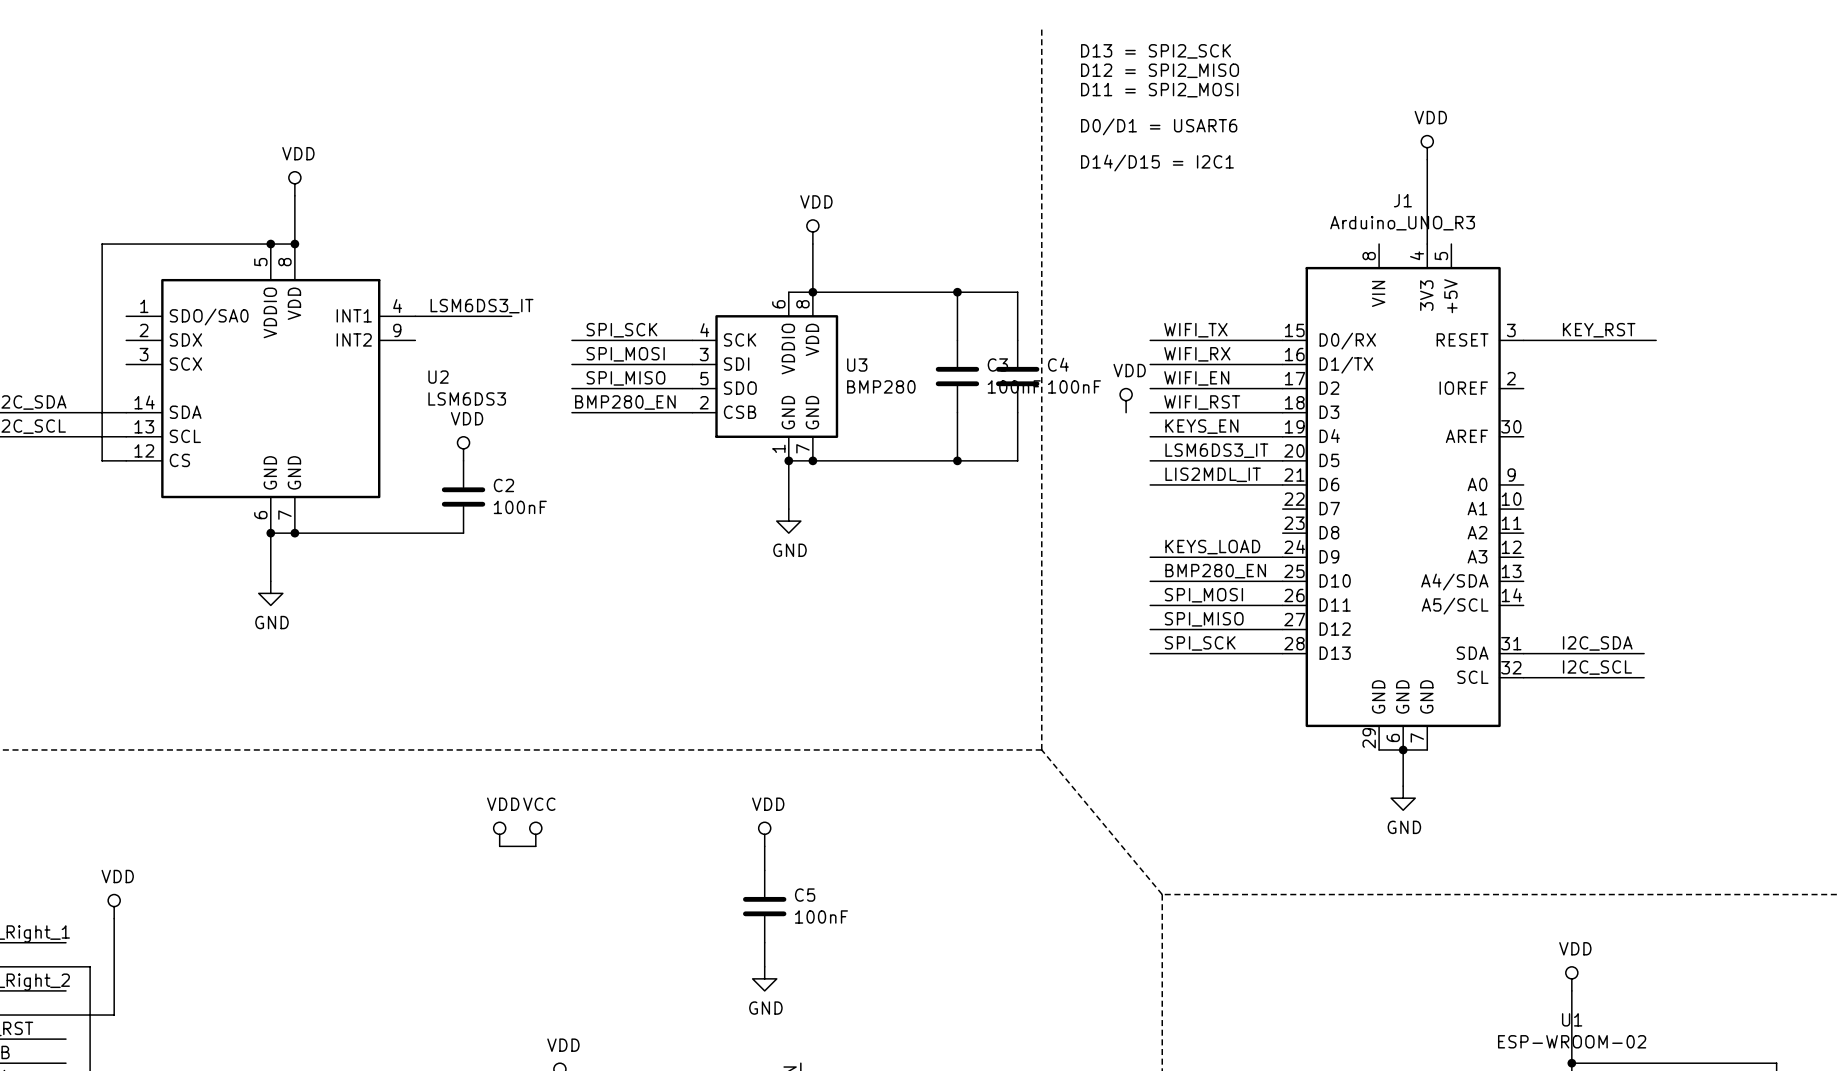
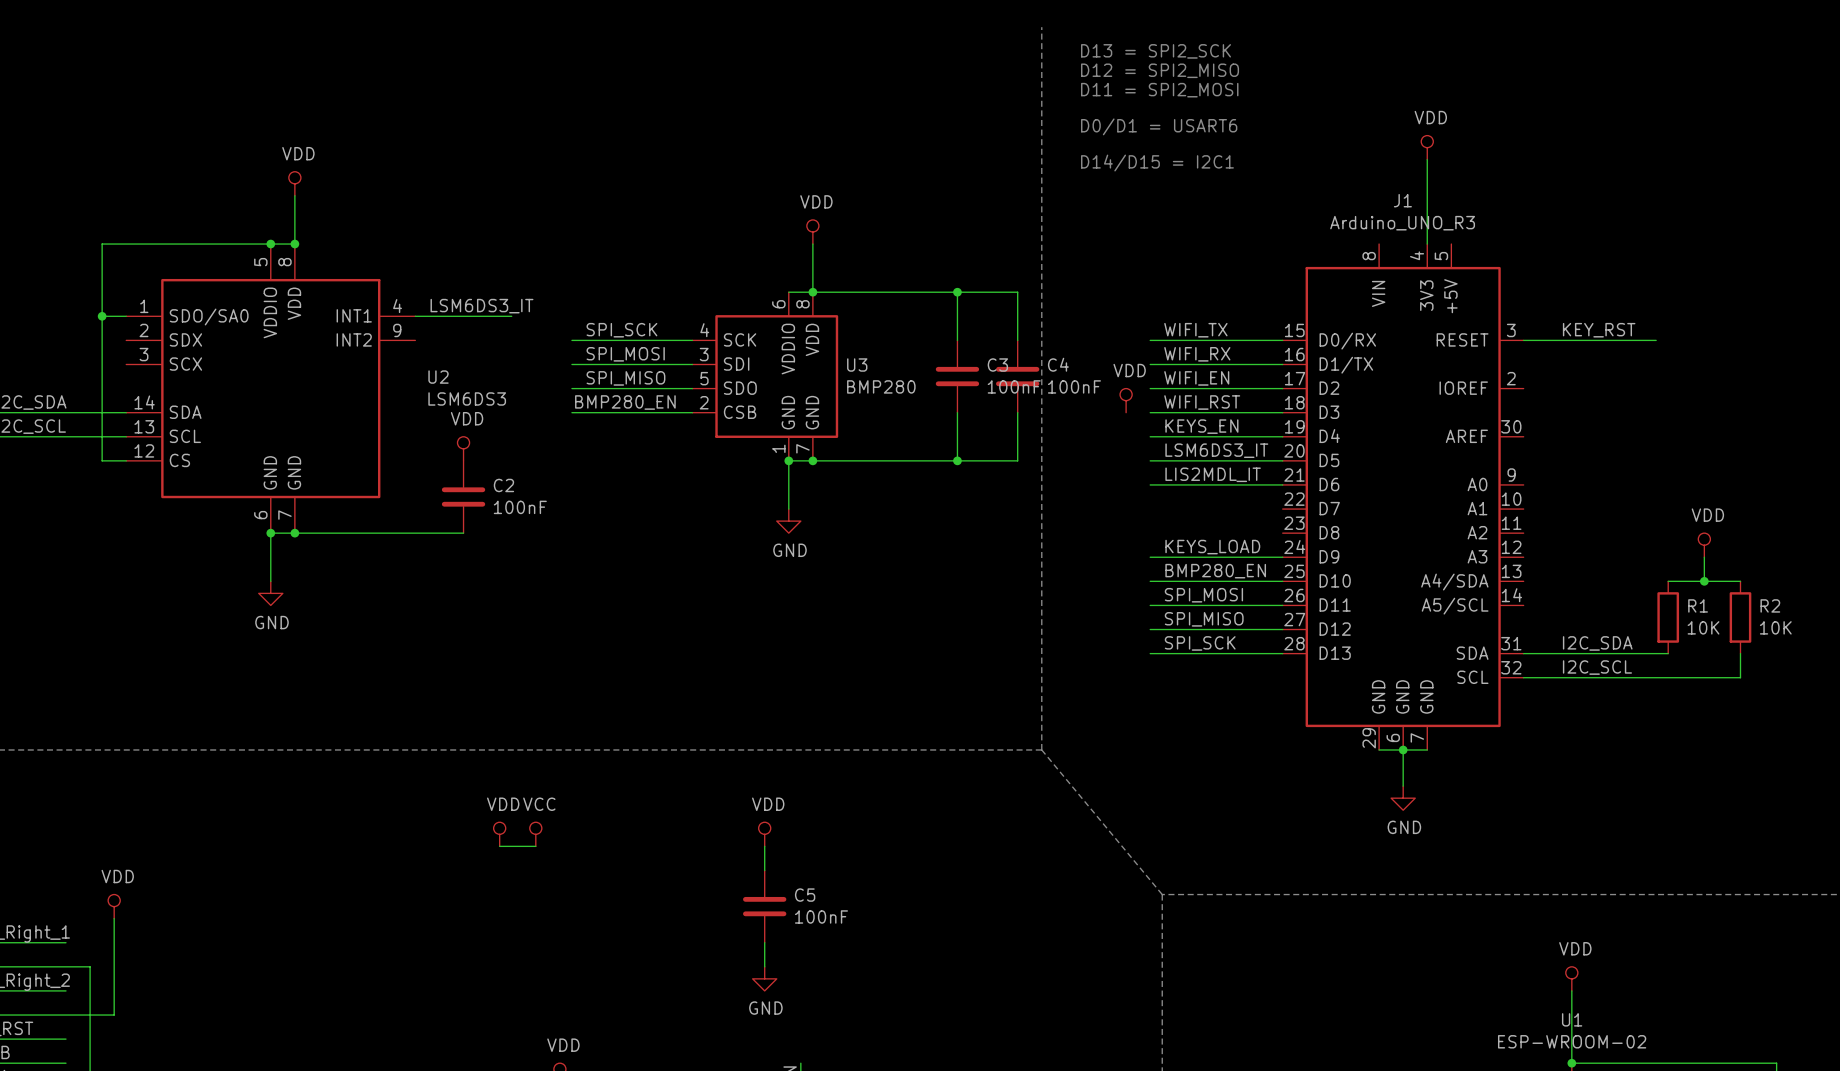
wire: none -> (102, 316) (126, 316)
junction: none -> (102, 316)
power symbol: none -> VDD (1704, 545)
wire: none -> (1704, 557) (1704, 581)
wire: none -> (1668, 581) (1740, 581)
junction: none -> (1704, 581)
R1: none -> 10K (1668, 617)
R2: none -> 10K (1740, 617)
wire: none -> (1644, 653) (1668, 653)
wire: none -> (1740, 653) (1740, 677) (1644, 677)

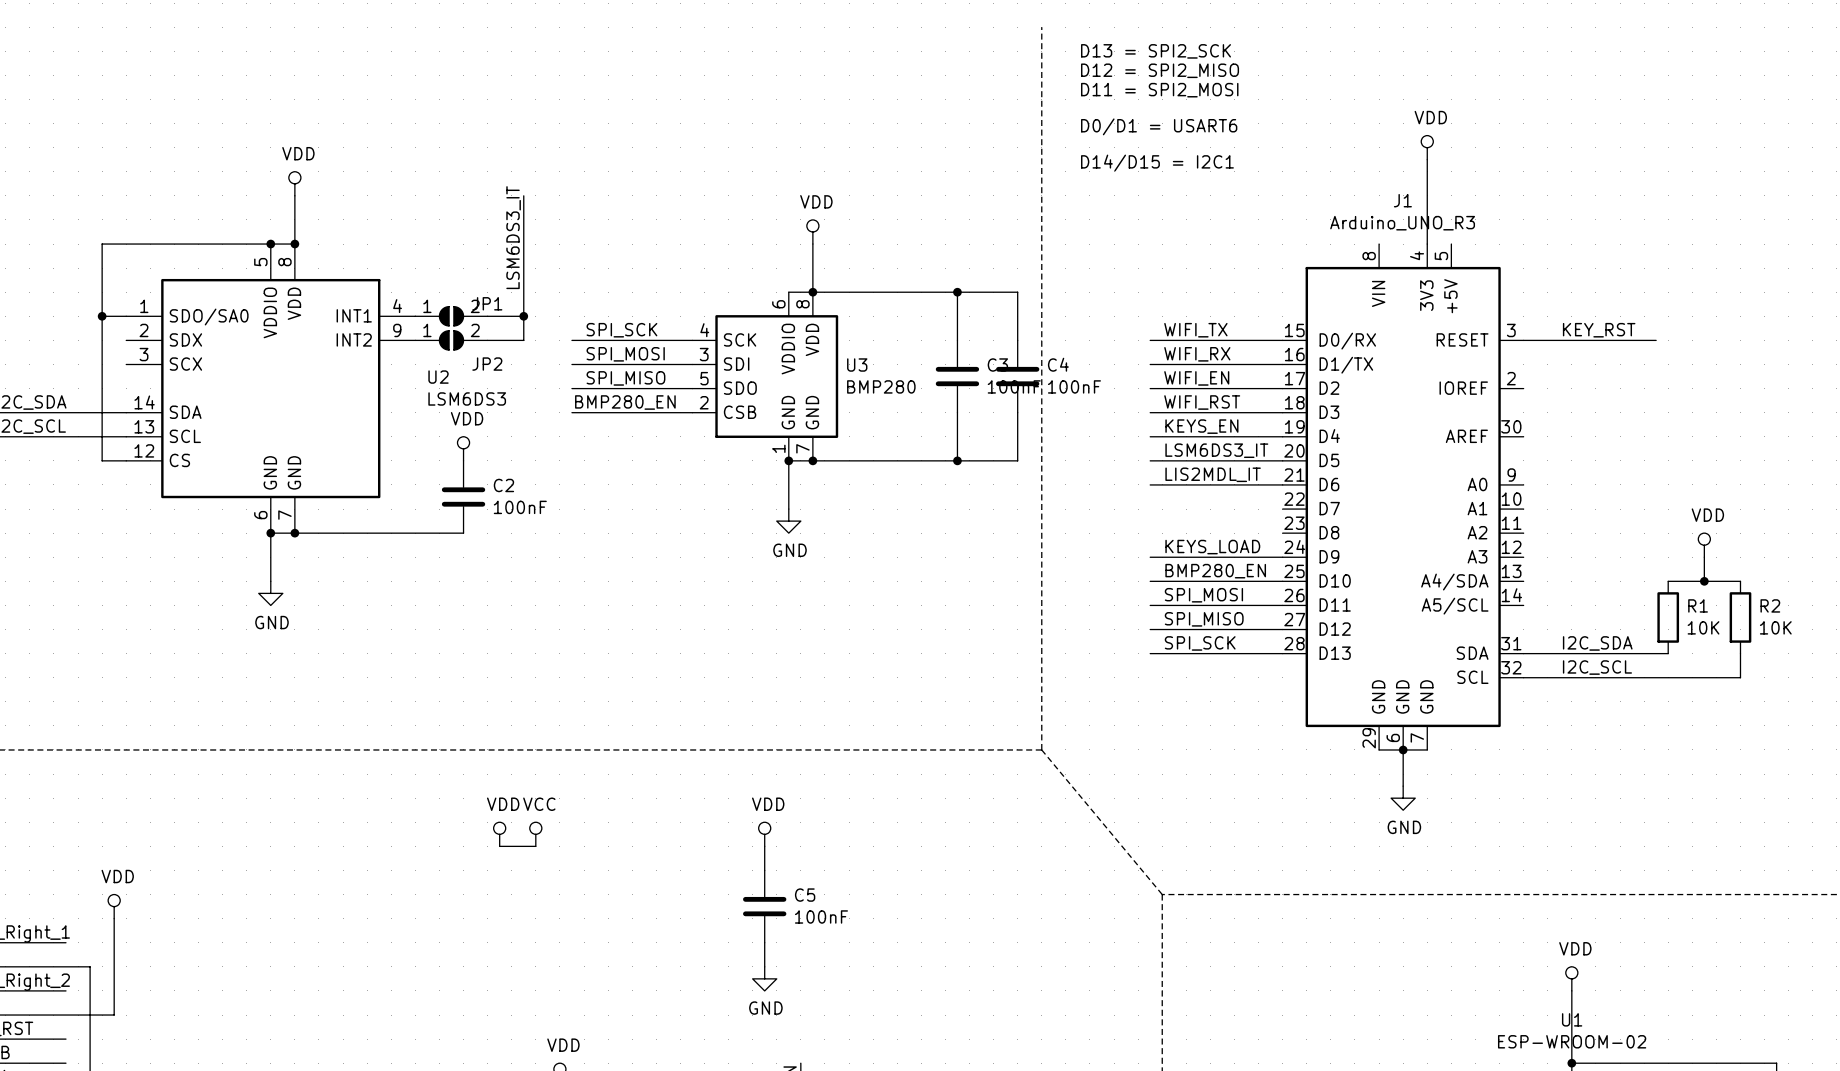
wire: none -> (523, 195) (523, 340) (487, 340)
label rotation: 0° (481, 306) -> 90° counterclockwise (513, 237)
JP1: none -> (451, 316)
wire: none -> (511, 316) (523, 316)
junction: none -> (523, 316)
JP2: none -> (451, 340)
power symbol: VDD (1126, 400) -> none

